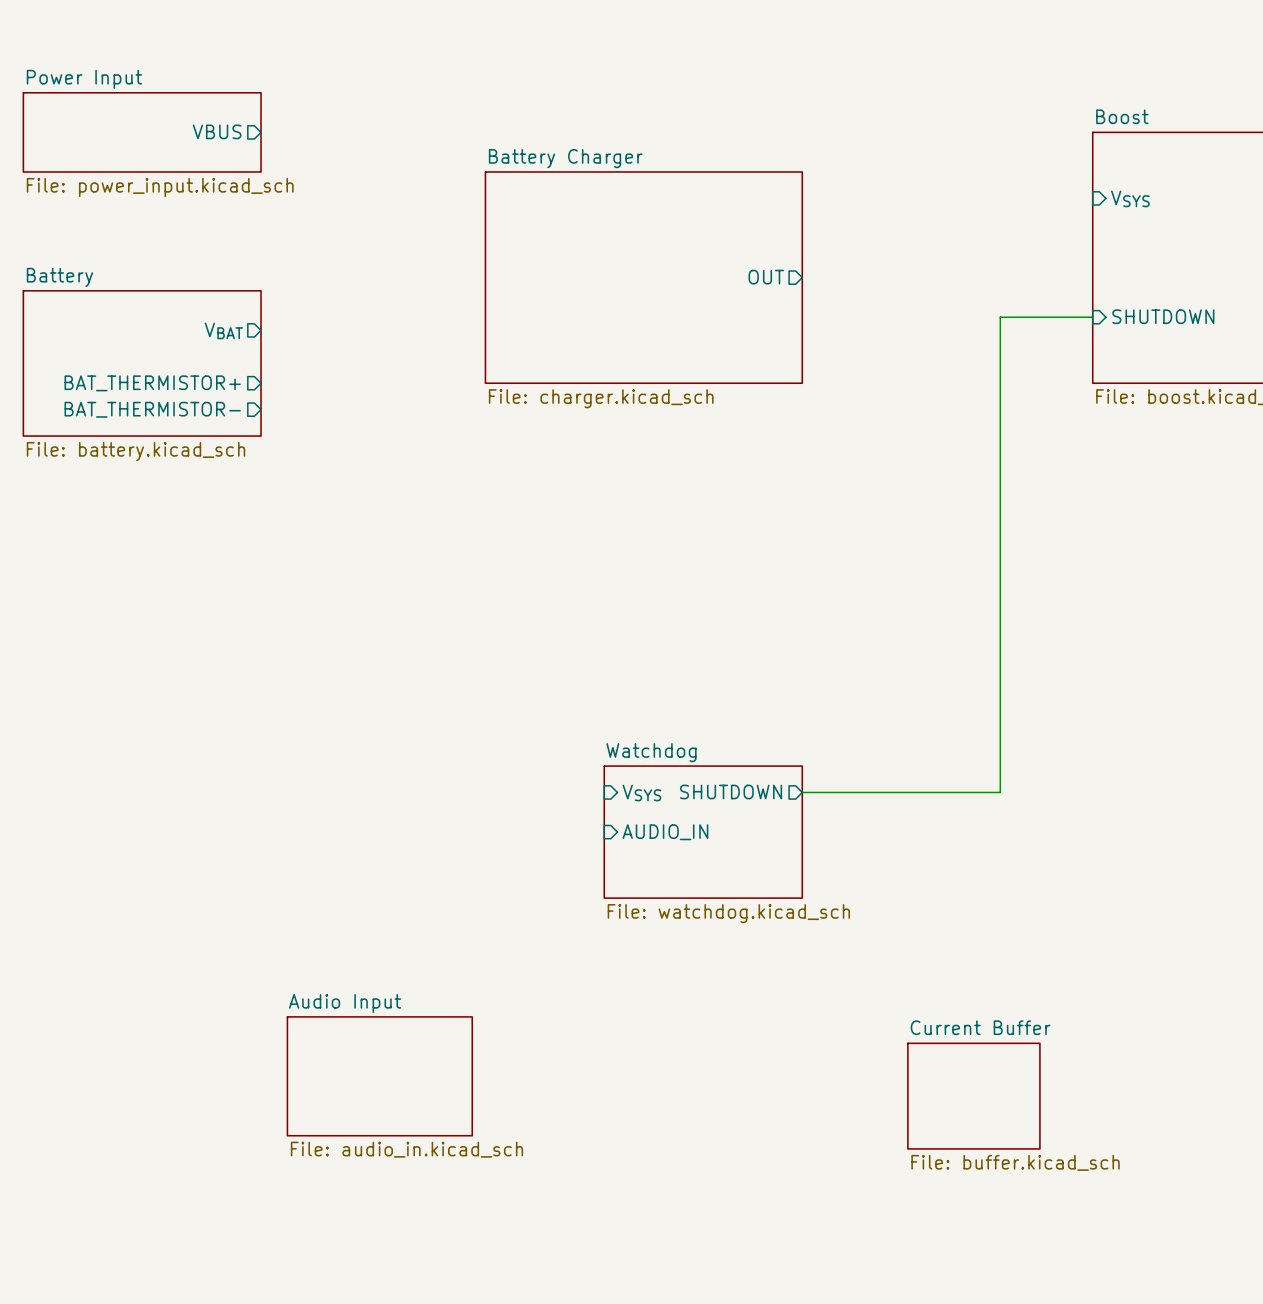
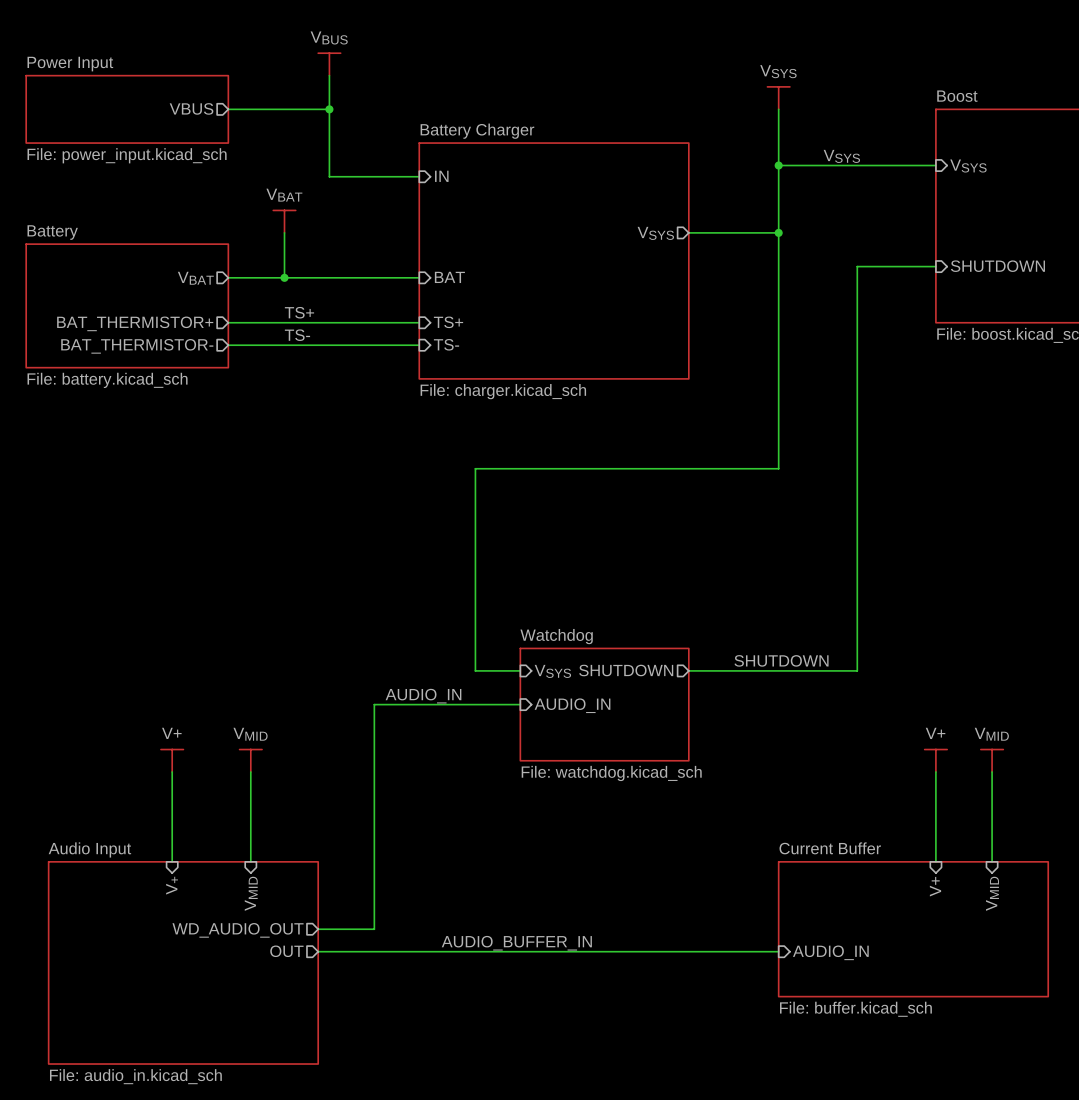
power symbol: none -> VBUS (329, 64)
wire: none -> (329, 75) (329, 176) (419, 176)
power symbol: none -> VSYS (778, 98)
wire: none -> (228, 109) (329, 109)
junction: none -> (329, 109)
wire: none -> (778, 109) (778, 468) (475, 468) (475, 670) (520, 670)
label: none -> VSYS (841, 156)
wire: none -> (778, 165) (935, 165)
junction: none -> (778, 165)
sheet pin: none -> IN (441, 176)
power symbol: none -> VBAT (284, 221)
wire: none -> (284, 232) (284, 277)
sheet Battery Charger: File: charger.kicad_sch (643, 277) -> none
sheet pin: OUT (766, 277) -> VSYS (655, 233)
wire: none -> (688, 232) (778, 232)
junction: none -> (778, 232)
sheet Battery Charger: none -> File: charger.kicad_sch (554, 260)
sheet pin: none -> BAT (449, 277)
wire: none -> (228, 277) (419, 277)
junction: none -> (284, 277)
label: none -> TS+ (299, 312)
sheet pin: none -> TS+ (448, 322)
wire: none -> (228, 322) (419, 322)
label: none -> TS- (297, 335)
wire: none -> (228, 345) (419, 345)
sheet pin: none -> TS- (446, 344)
label: none -> SHUTDOWN (781, 660)
label: none -> AUDIO_IN (423, 696)
wire: none -> (520, 704) (374, 704) (374, 929) (318, 929)
power symbol: none -> V+ (172, 760)
power symbol: none -> VMID (250, 760)
power symbol: none -> V+ (935, 760)
power symbol: none -> VMID (992, 760)
wire: none -> (172, 772) (172, 861)
wire: none -> (250, 772) (250, 861)
wire: none -> (935, 772) (935, 861)
wire: none -> (992, 772) (992, 861)
sheet pin: none -> V+ (172, 885)
sheet pin: none -> V+ (935, 886)
sheet pin: none -> VMID (251, 893)
sheet pin: none -> VMID (992, 893)
sheet Audio Input: File: audio_in.kicad_sch (379, 1076) -> none
sheet pin: none -> WD_AUDIO_OUT (238, 930)
sheet Current Buffer: File: buffer.kicad_sch (973, 1096) -> none
sheet Current Buffer: none -> File: buffer.kicad_sch (913, 929)
label: none -> AUDIO_BUFFER_IN (516, 943)
sheet pin: none -> OUT (286, 951)
wire: none -> (318, 951) (778, 951)
sheet pin: none -> AUDIO_IN (830, 952)
sheet Audio Input: none -> File: audio_in.kicad_sch (183, 962)

